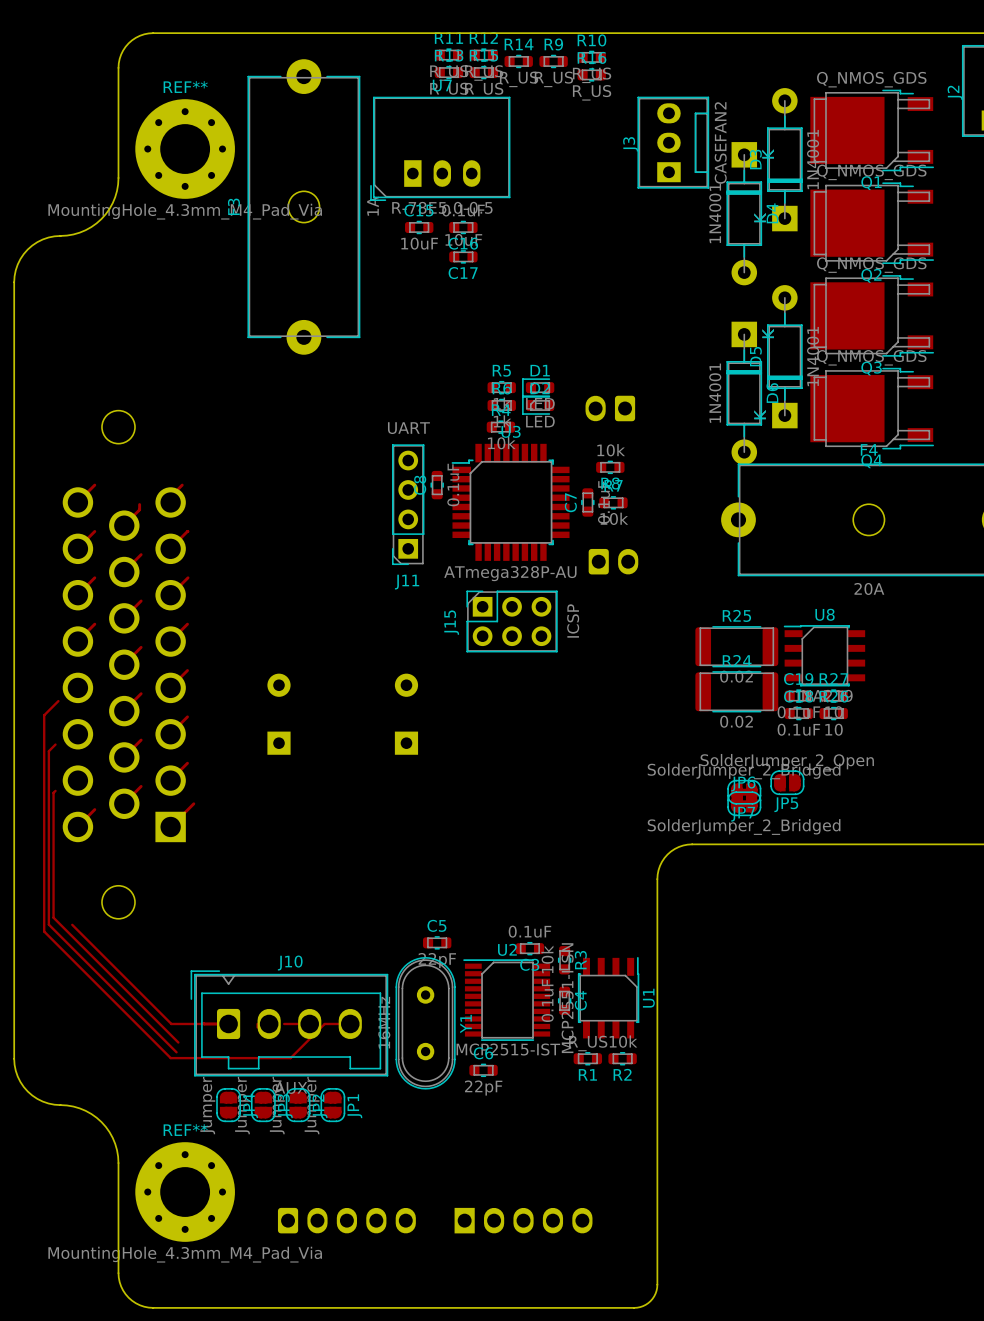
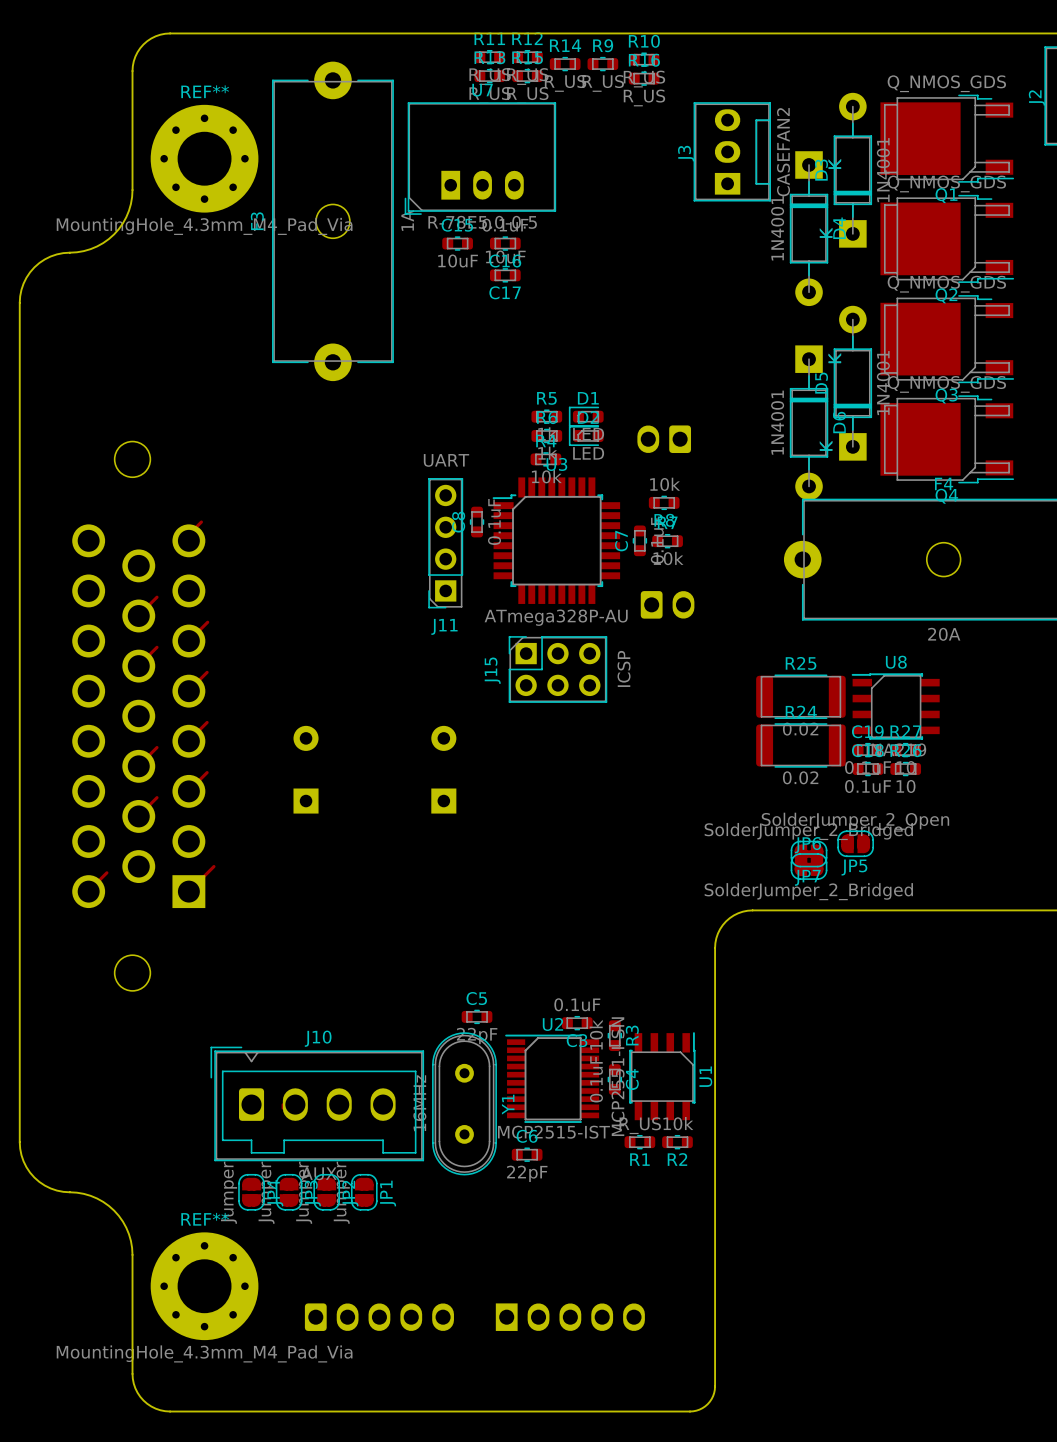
track: (94, 485) (78, 501) -> none
track: (139, 504) (139, 509) (124, 525) -> none
track: (94, 531) (78, 548) -> none
track: (188, 531) (170, 548) -> none
track: (94, 577) (78, 594) -> none
track: (94, 624) (78, 640) -> none
track: (141, 647) (124, 664) -> none
track: (58, 701) (44, 715) (44, 931) (170, 1058) (290, 1058) (324, 1023) (338, 1023) -> none
track: (55, 744) (48, 751) (48, 924) (176, 1052) -> none
track: (187, 763) (170, 779) -> none
track: (141, 786) (124, 803) -> none
track: (55, 790) (53, 792) (53, 917) (178, 1042) -> none
track: (72, 924) (171, 1023) (217, 1023) (203, 1023) -> none
track: (284, 1023) (298, 1023) -> none

